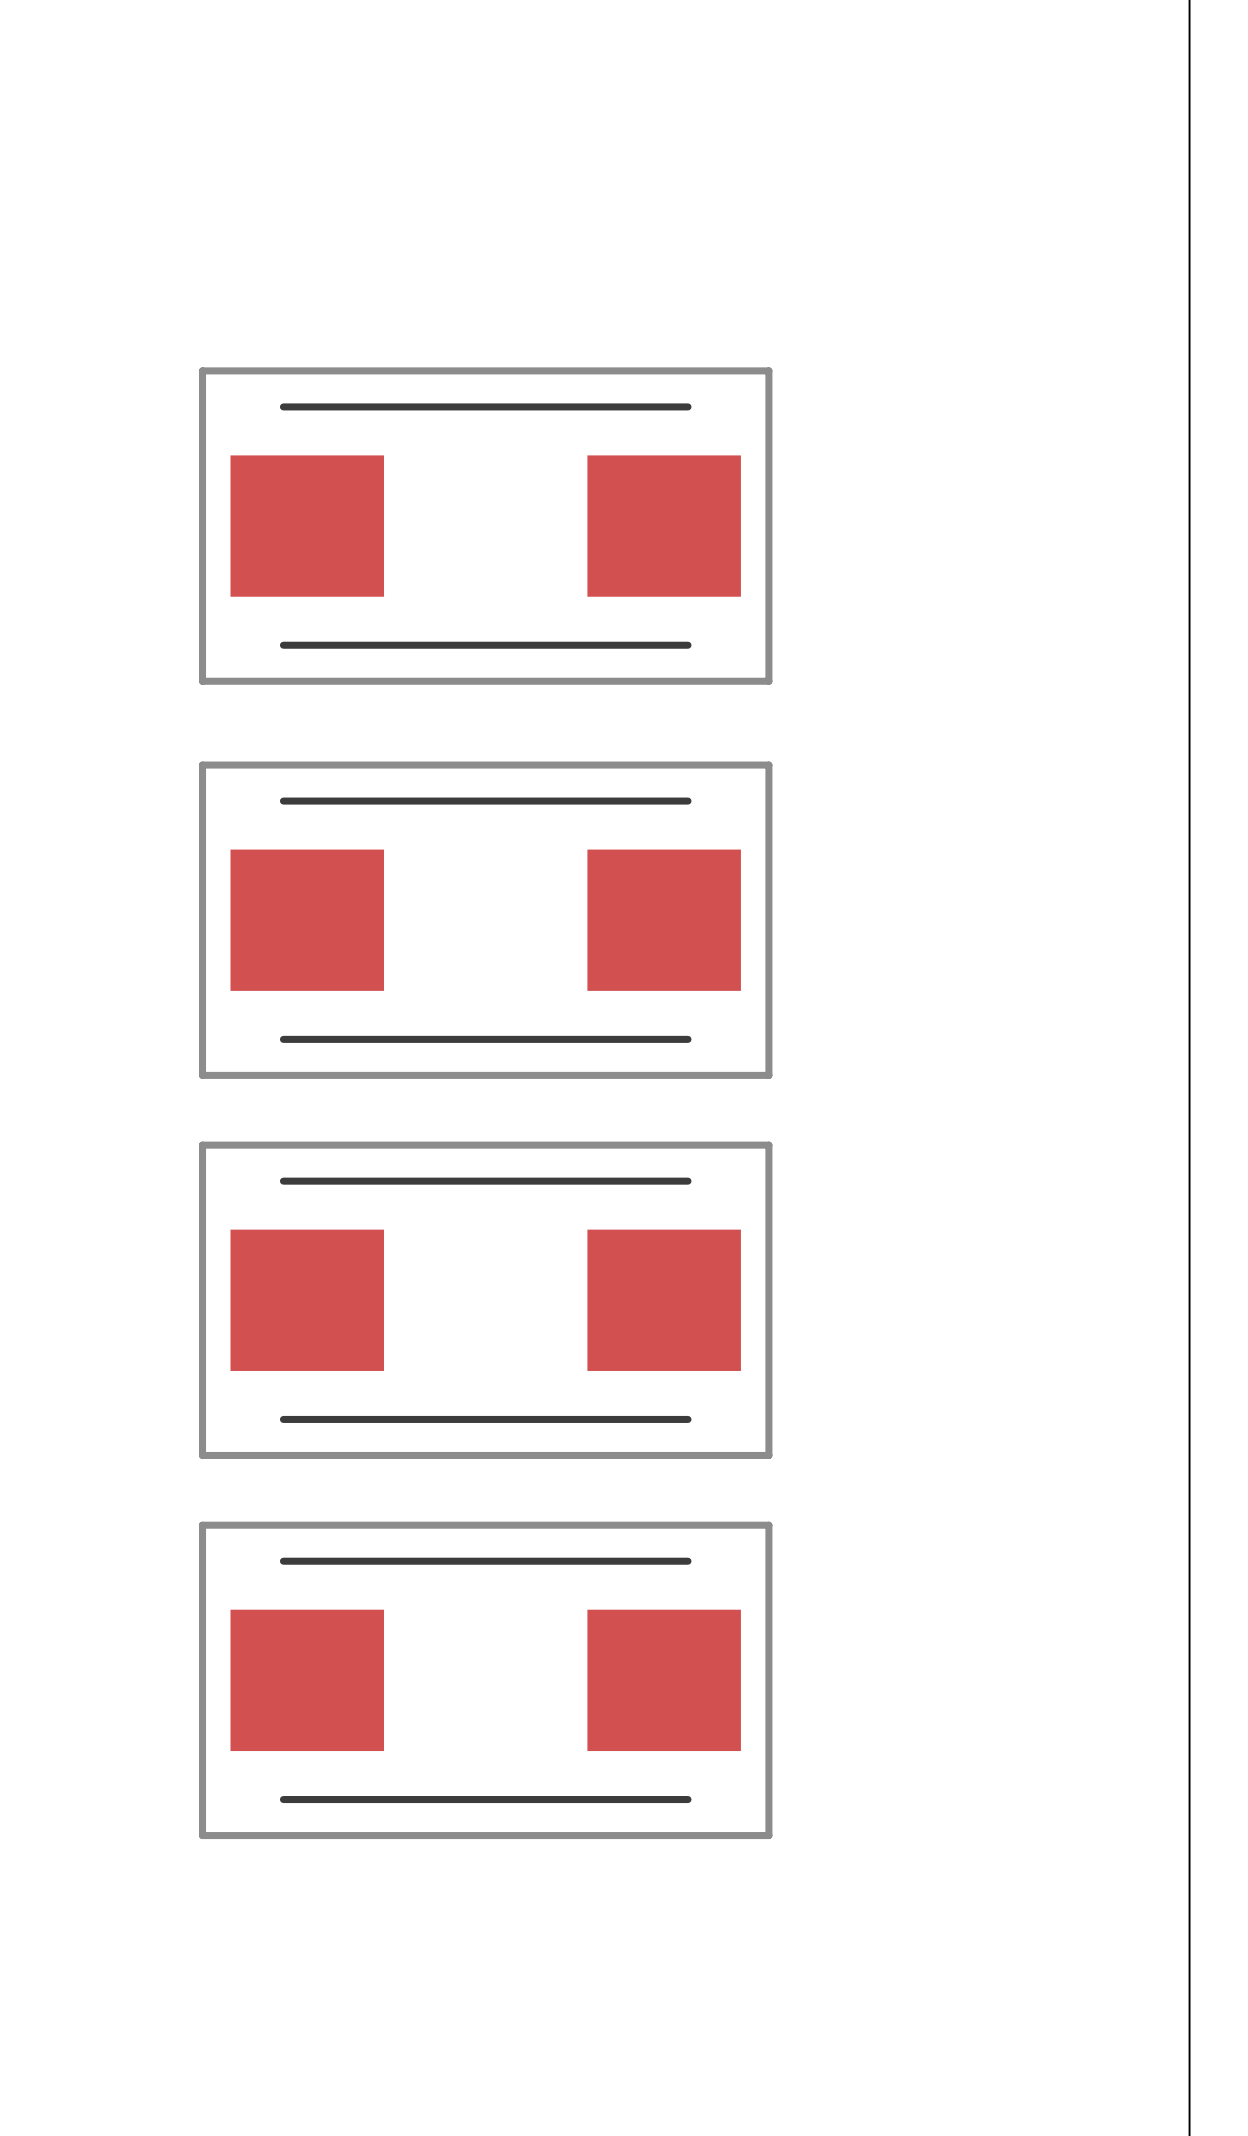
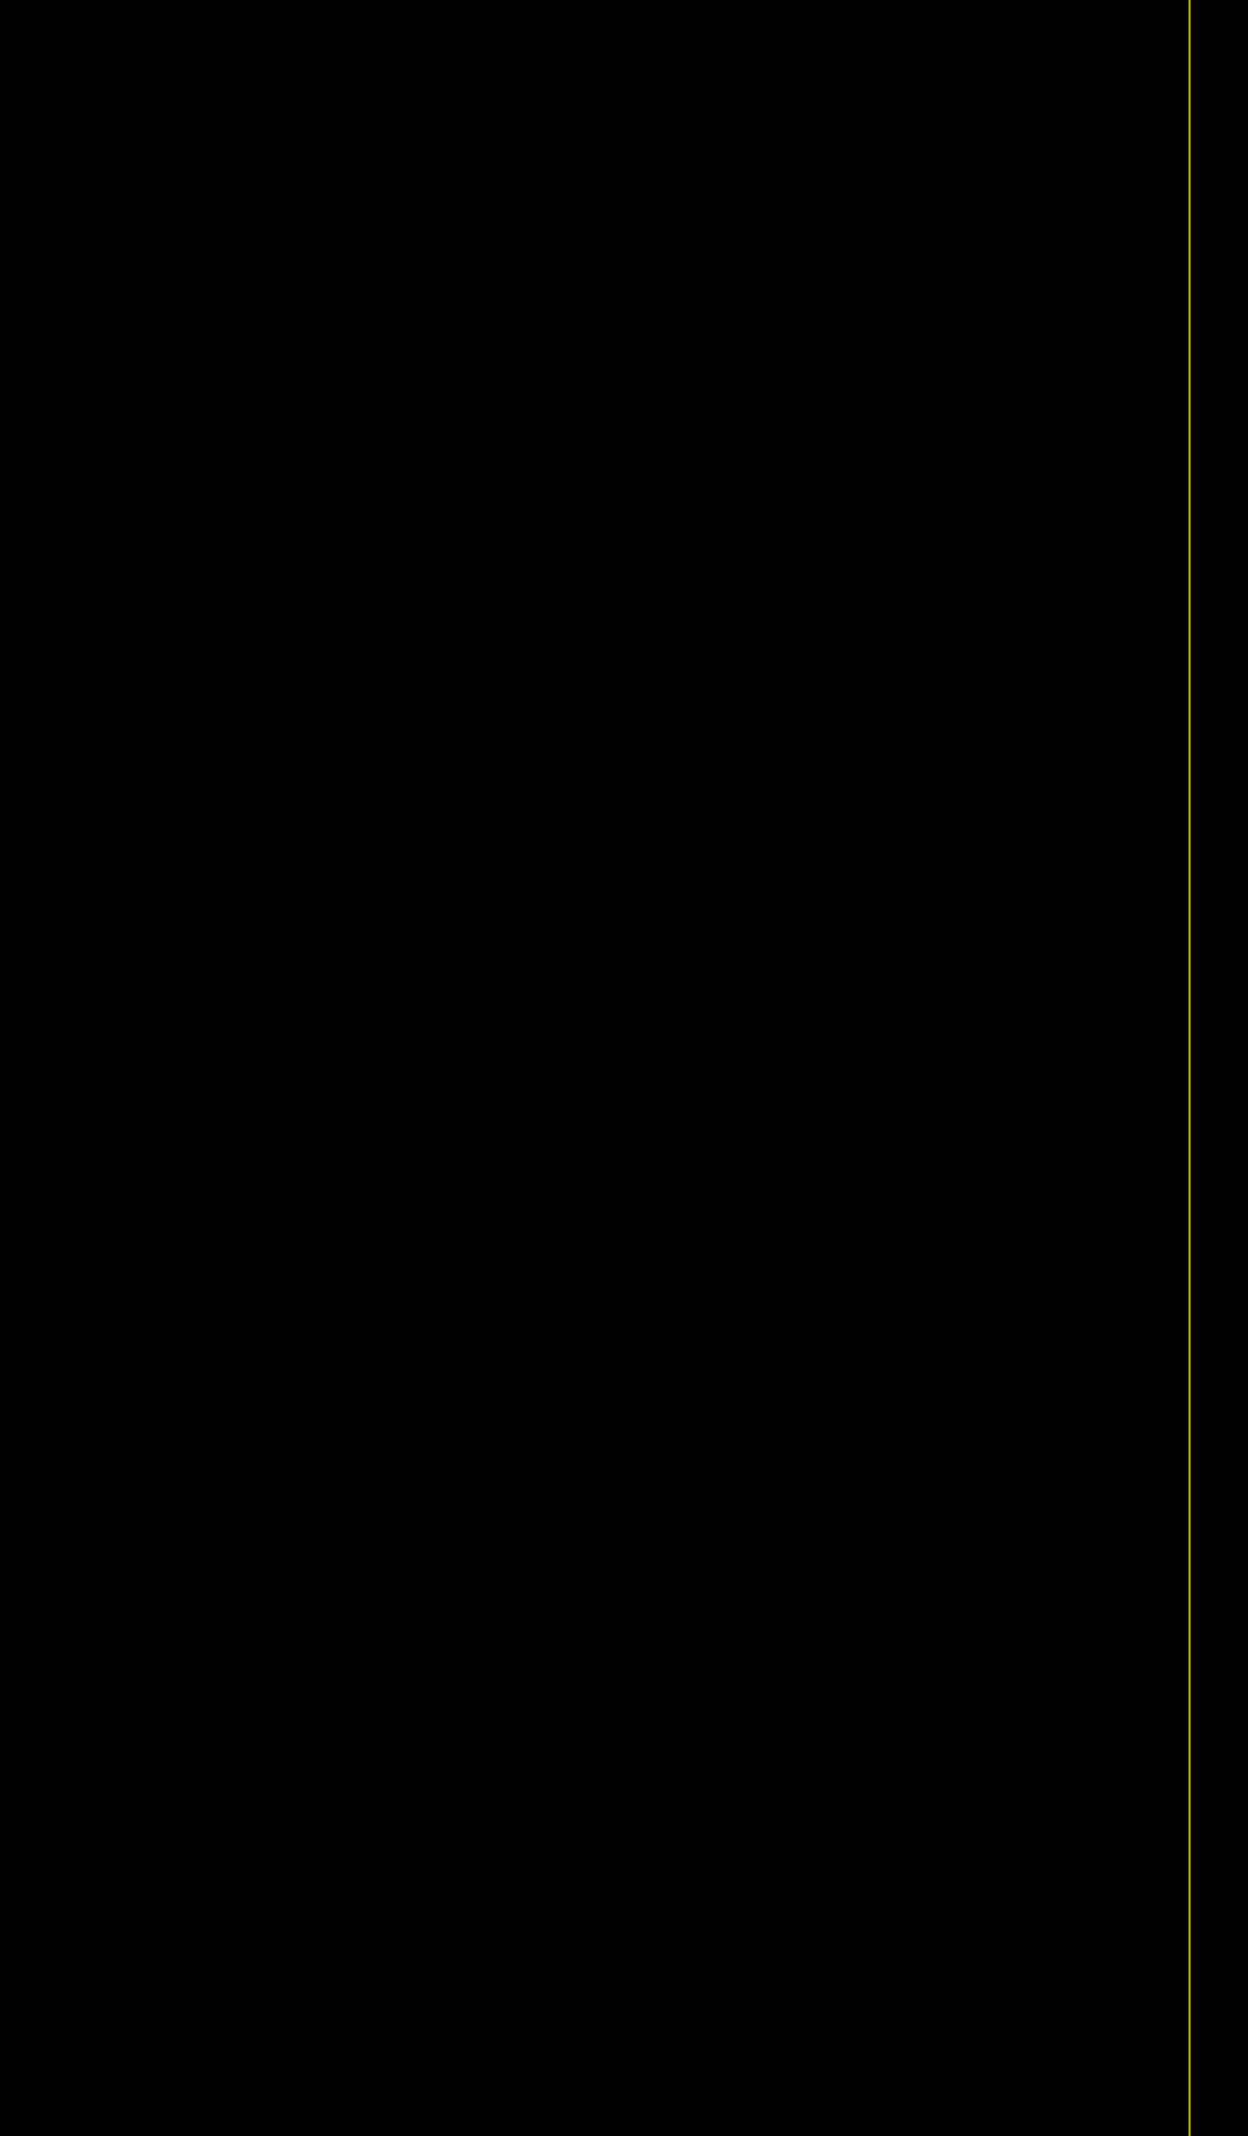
part: (485, 526) -> none
part: (485, 920) -> none
part: (485, 1300) -> none
part: (485, 1680) -> none

